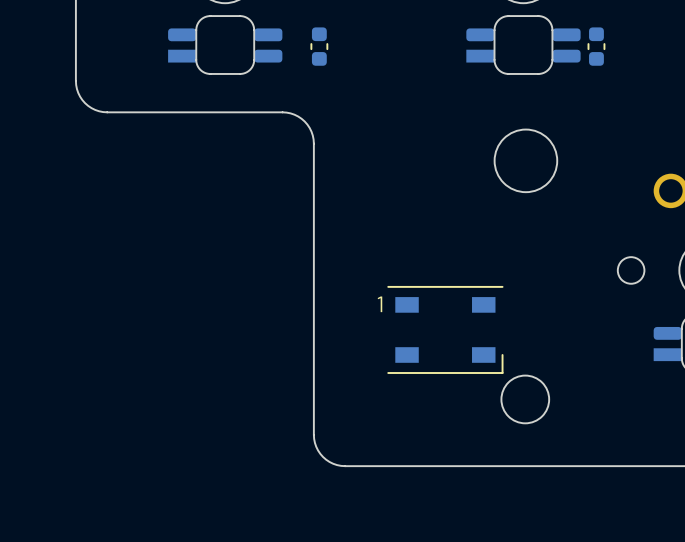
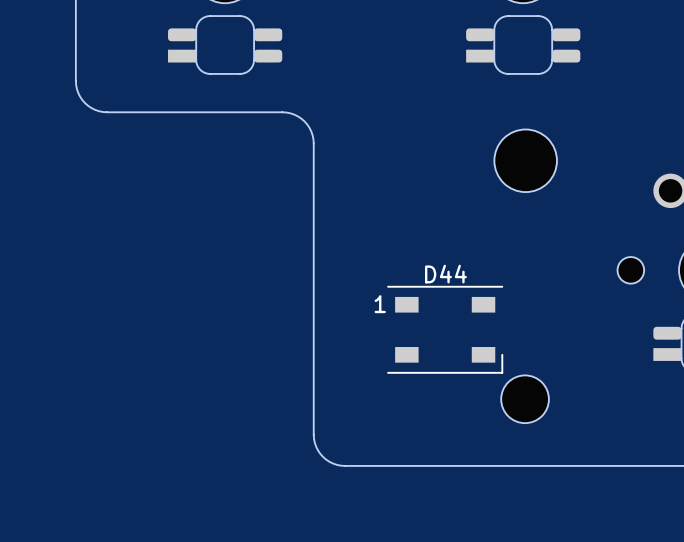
part: (319, 46) -> none
part: (596, 46) -> none
D44 name: none -> D44 (445, 274)

